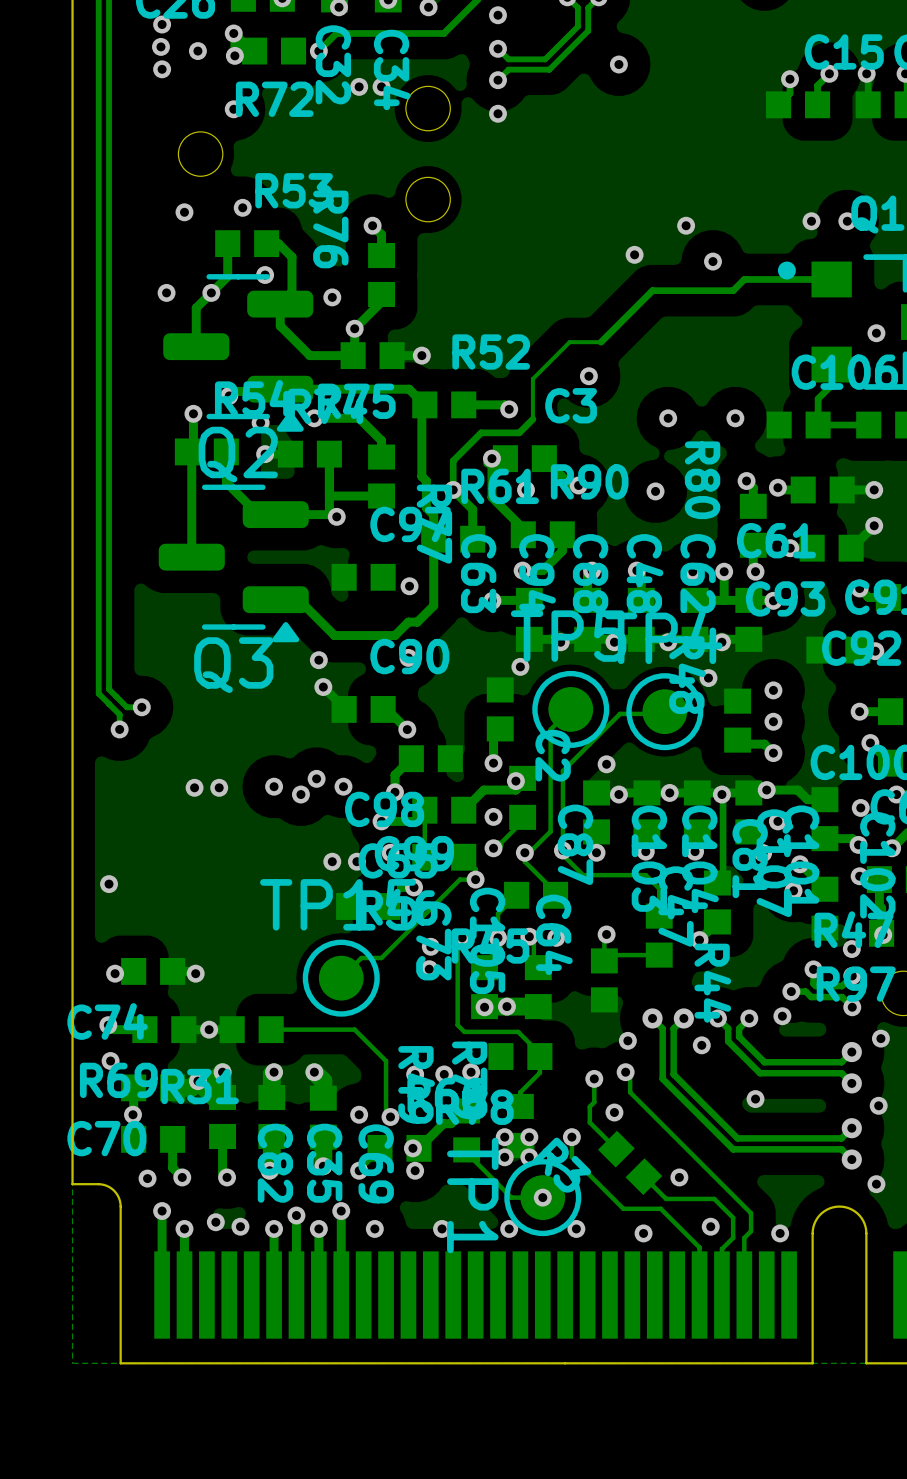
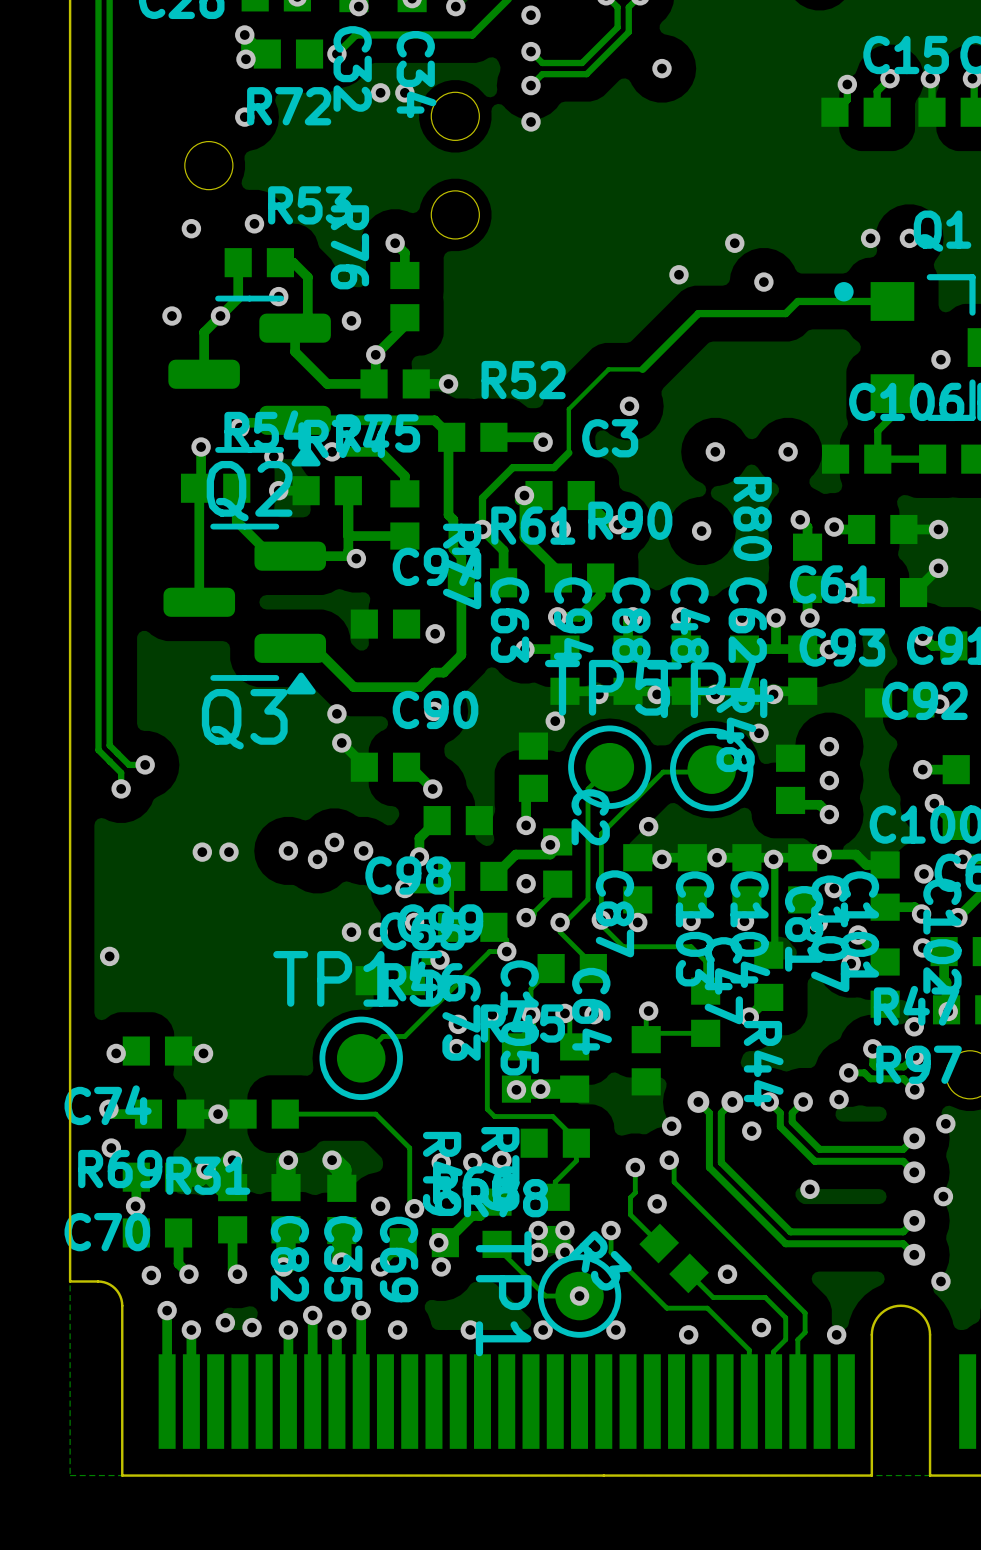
via: (162, 24) -> none
via: (160, 46) -> none
via: (197, 51) -> none
via: (162, 69) -> none

